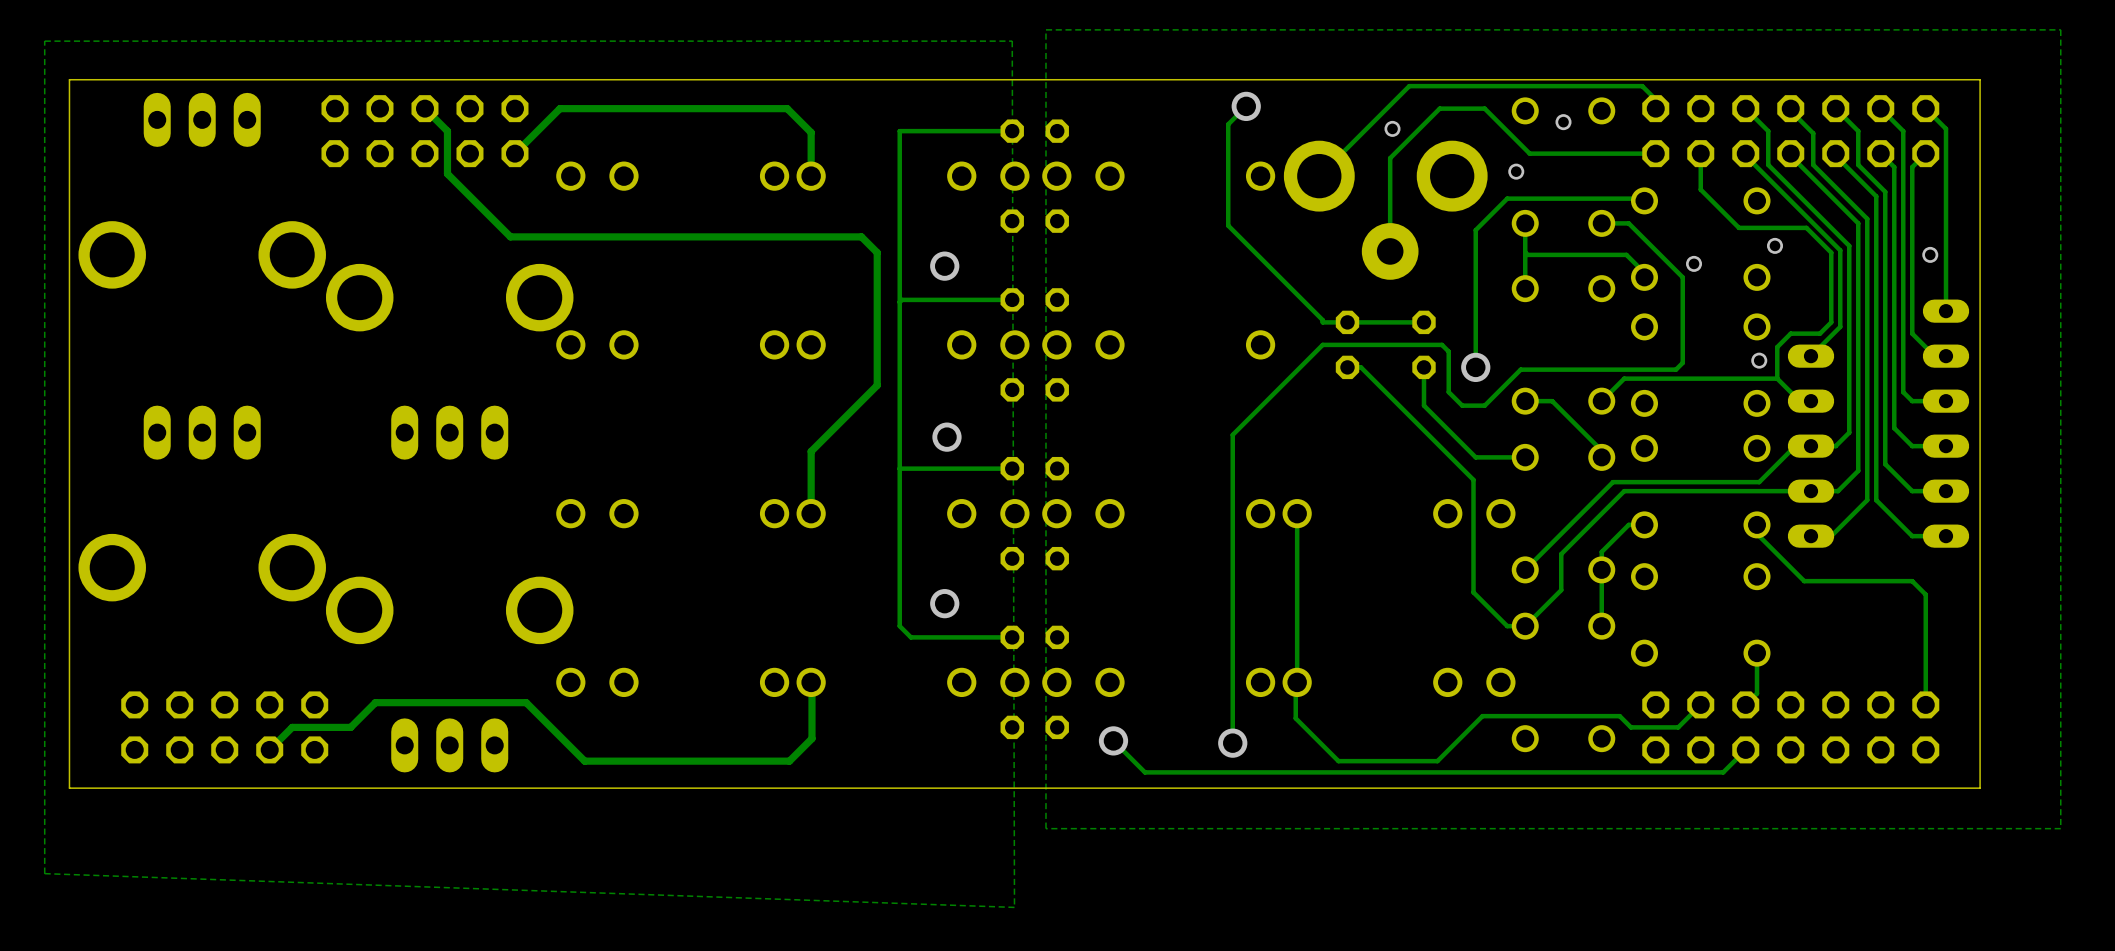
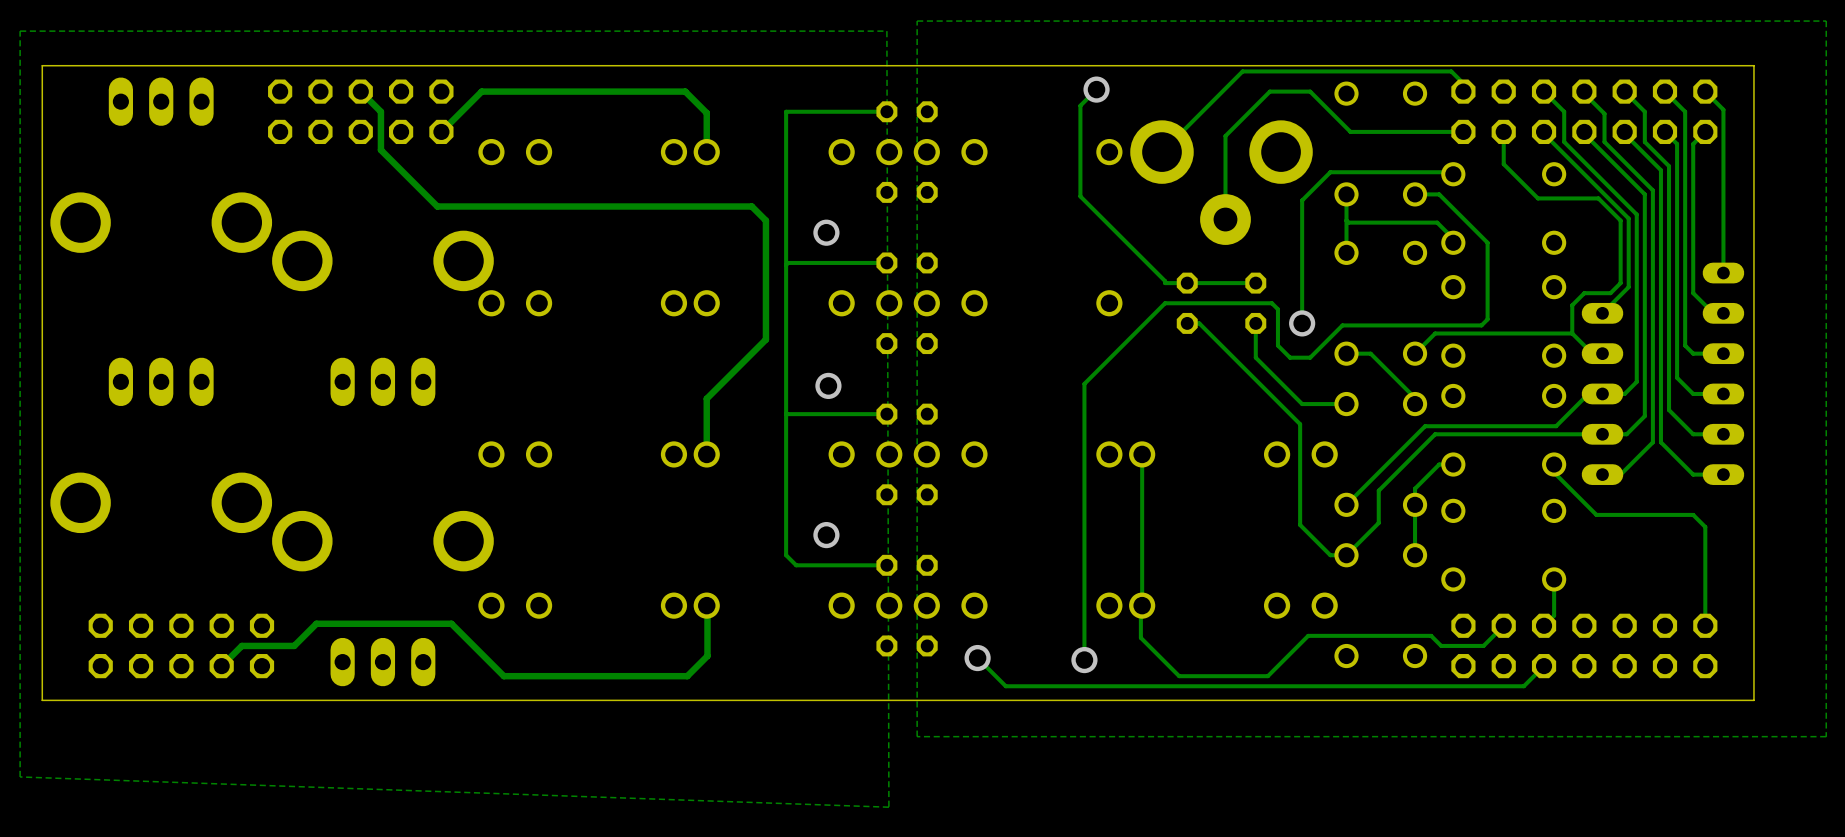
via: (1563, 122) -> none
via: (1392, 128) -> none
via: (1516, 171) -> none
via: (1775, 245) -> none
via: (1930, 254) -> none
via: (1694, 263) -> none
via: (1759, 360) -> none

